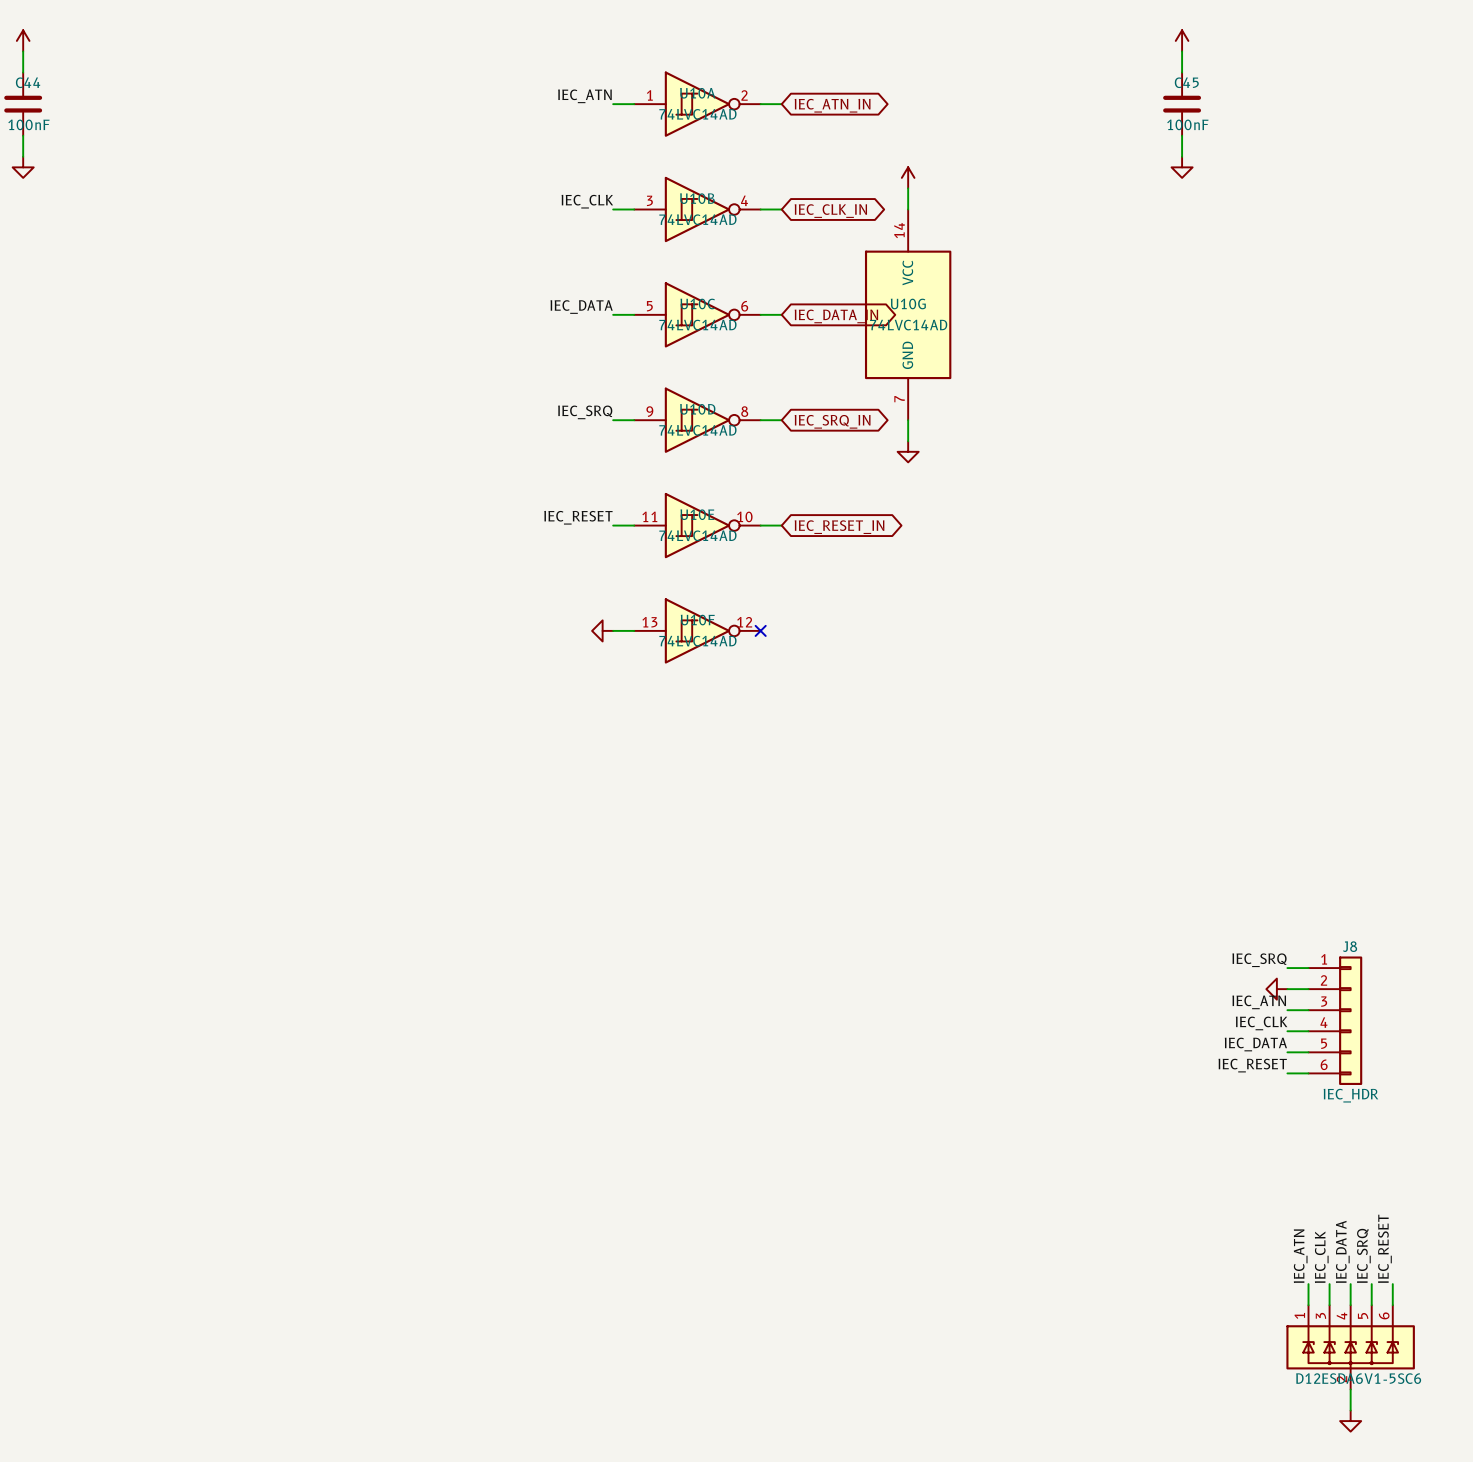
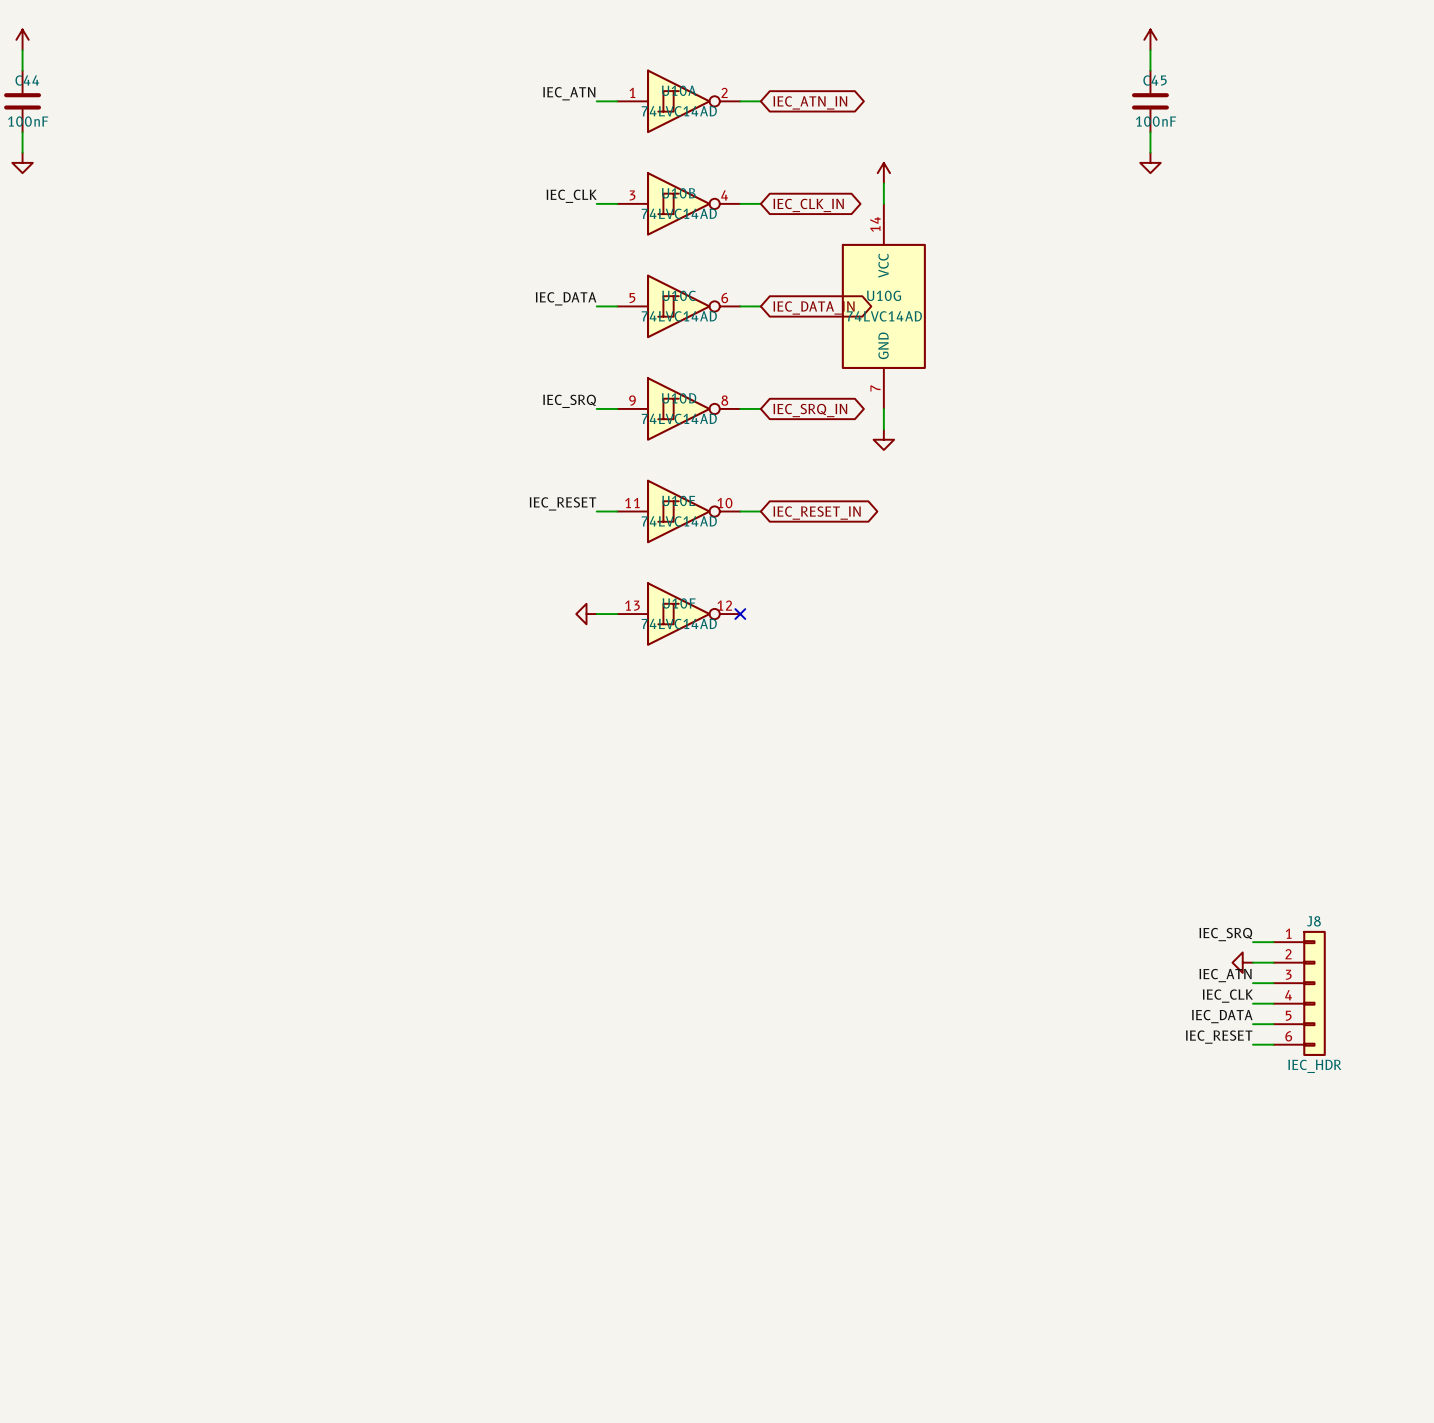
label: IEC_RESET (1384, 1248) -> none
label: IEC_DATA (1342, 1251) -> none
label: IEC_SRQ (1363, 1255) -> none
label: IEC_ATN (1300, 1256) -> none
label: IEC_CLK (1321, 1257) -> none
wire: (1308, 1284) (1308, 1305) -> none
wire: (1329, 1284) (1329, 1305) -> none
wire: (1350, 1284) (1350, 1305) -> none
wire: (1371, 1284) (1371, 1305) -> none
wire: (1392, 1284) (1392, 1305) -> none
D12: ESDA6V1-5SC6 (1350, 1347) -> none
wire: (1350, 1389) (1350, 1410) -> none
power symbol: (1350, 1421) -> none

